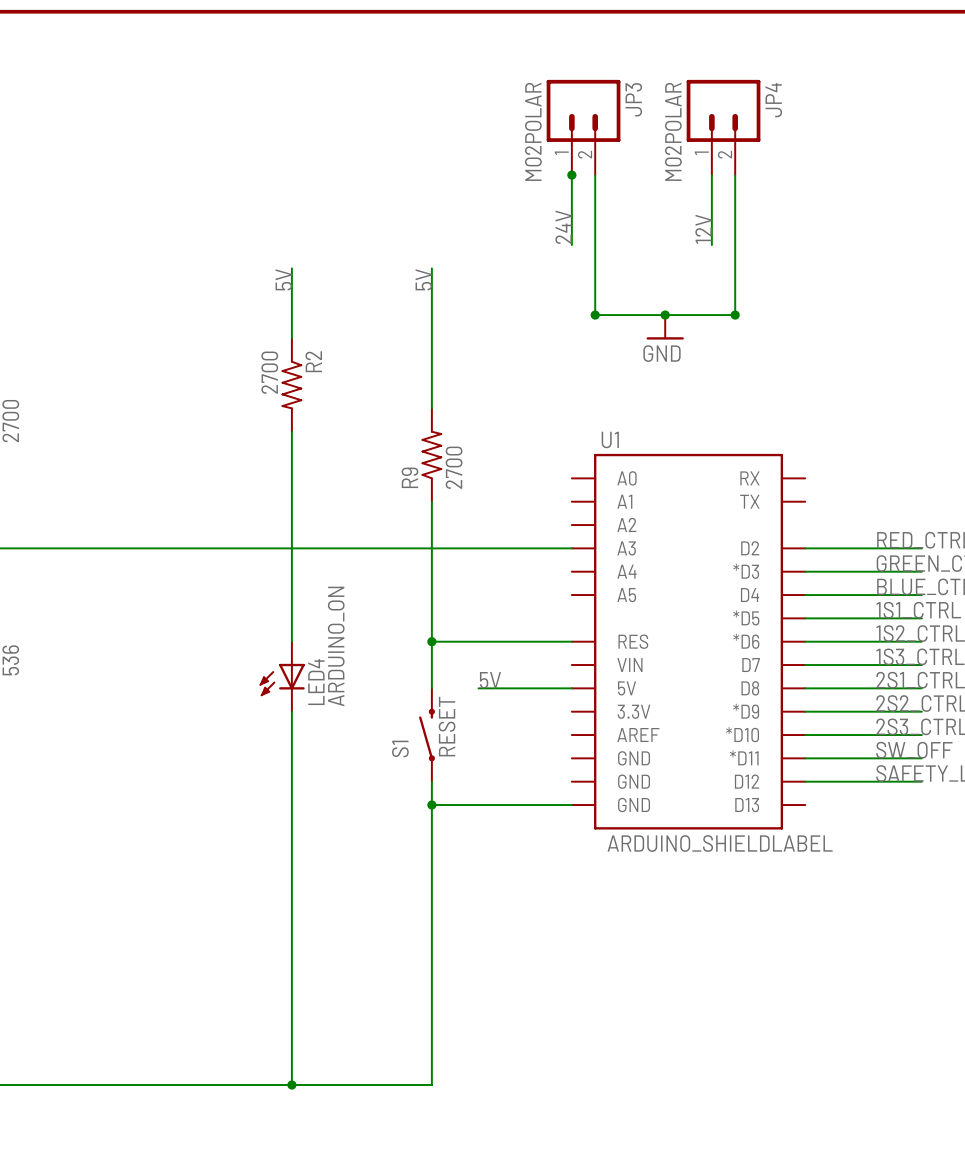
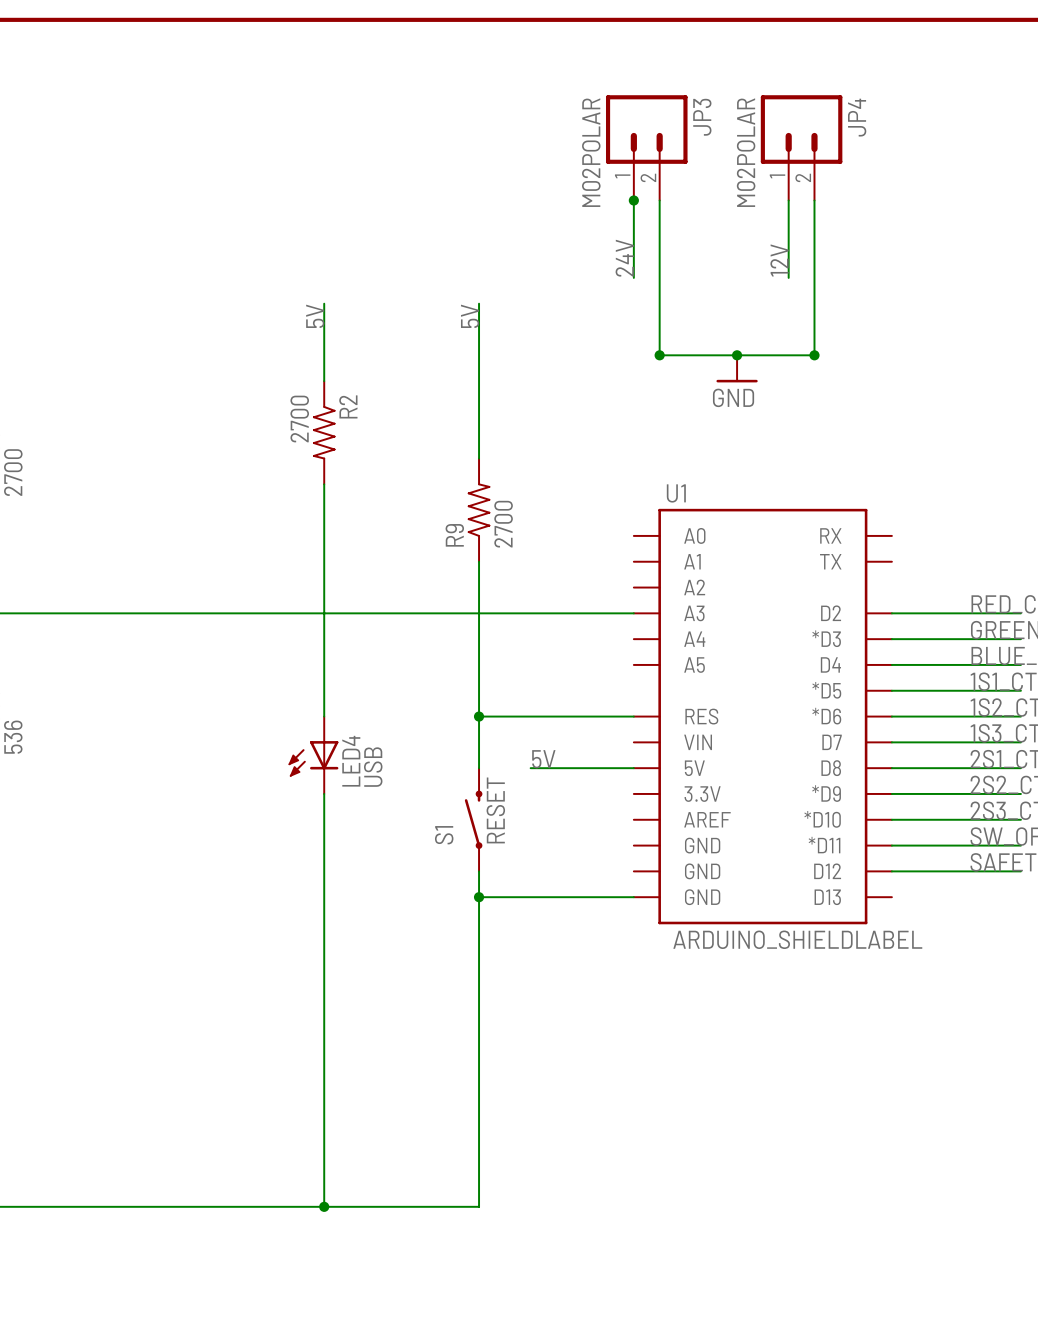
LED4 value: ARDUINO_ON (336, 646) -> USB (373, 767)

